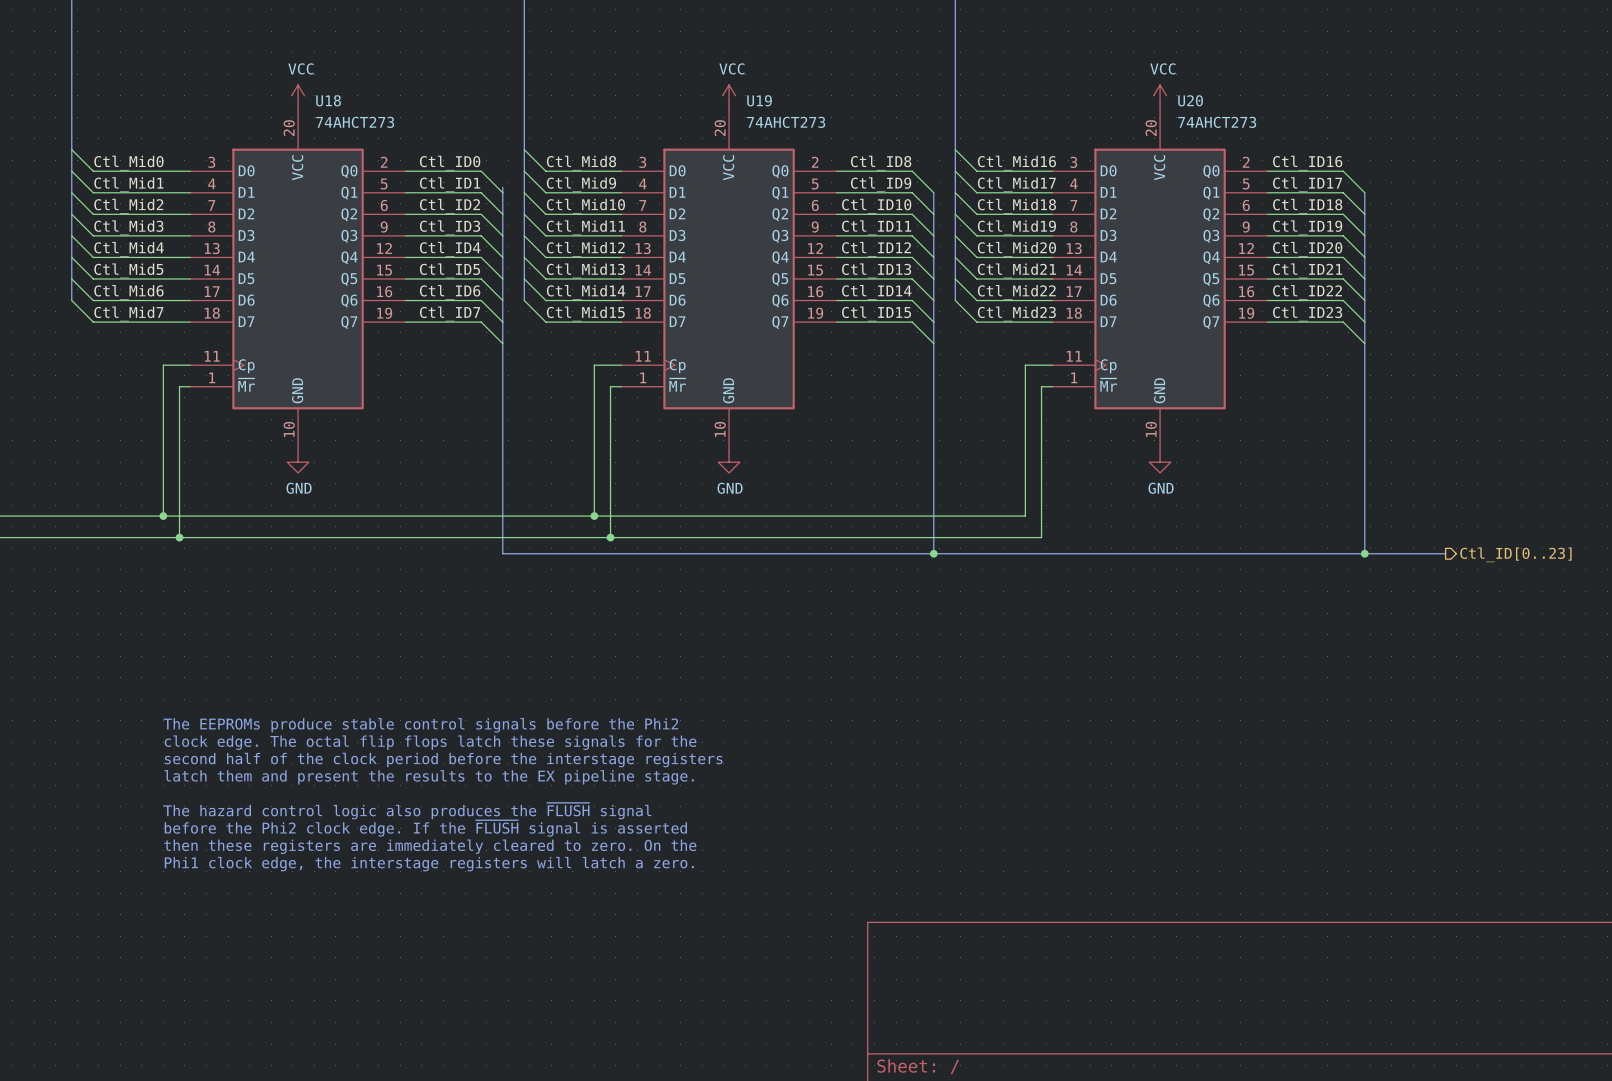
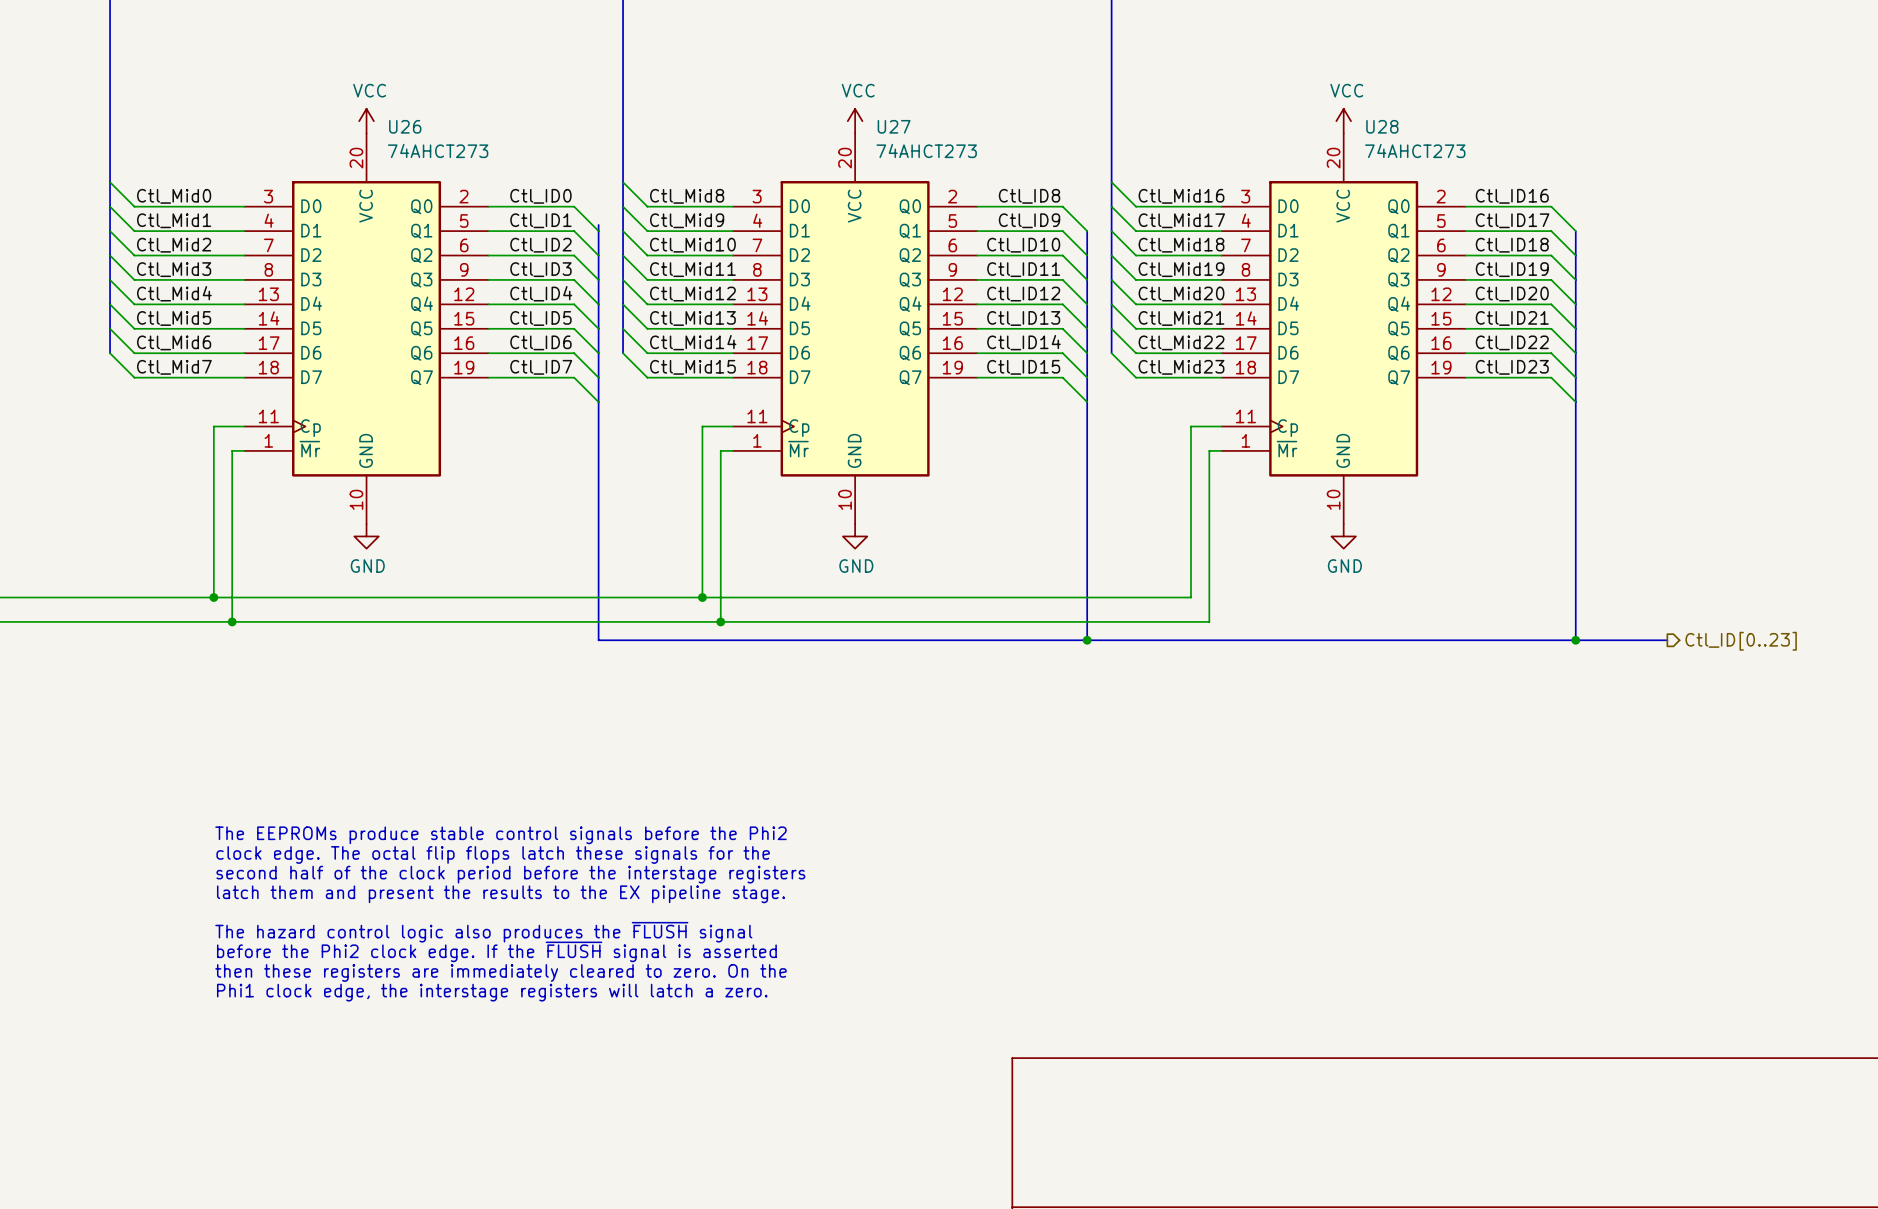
U18 name: U18 (328, 100) -> U26 (405, 126)
U19 name: U19 (759, 100) -> U27 (894, 126)
U20 name: U20 (1190, 100) -> U28 (1382, 126)

